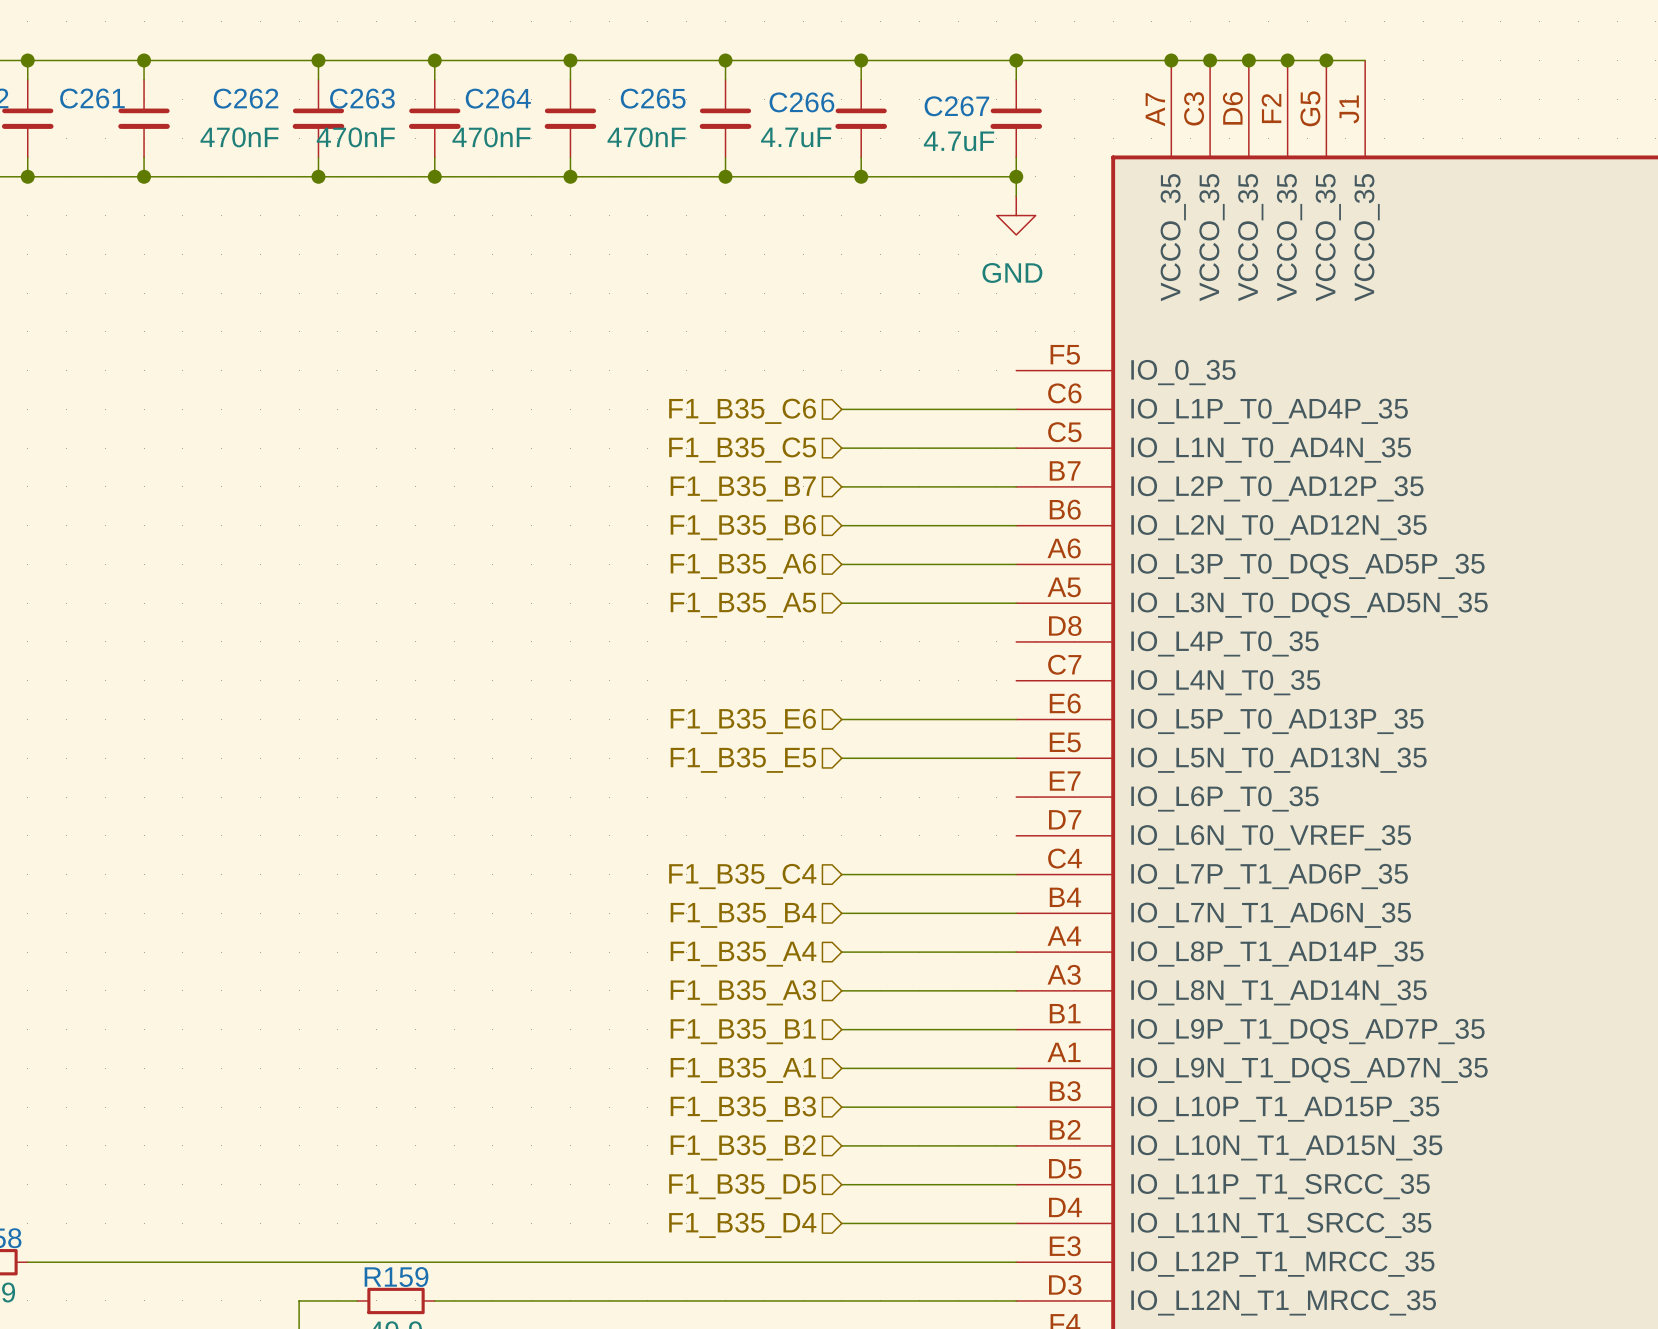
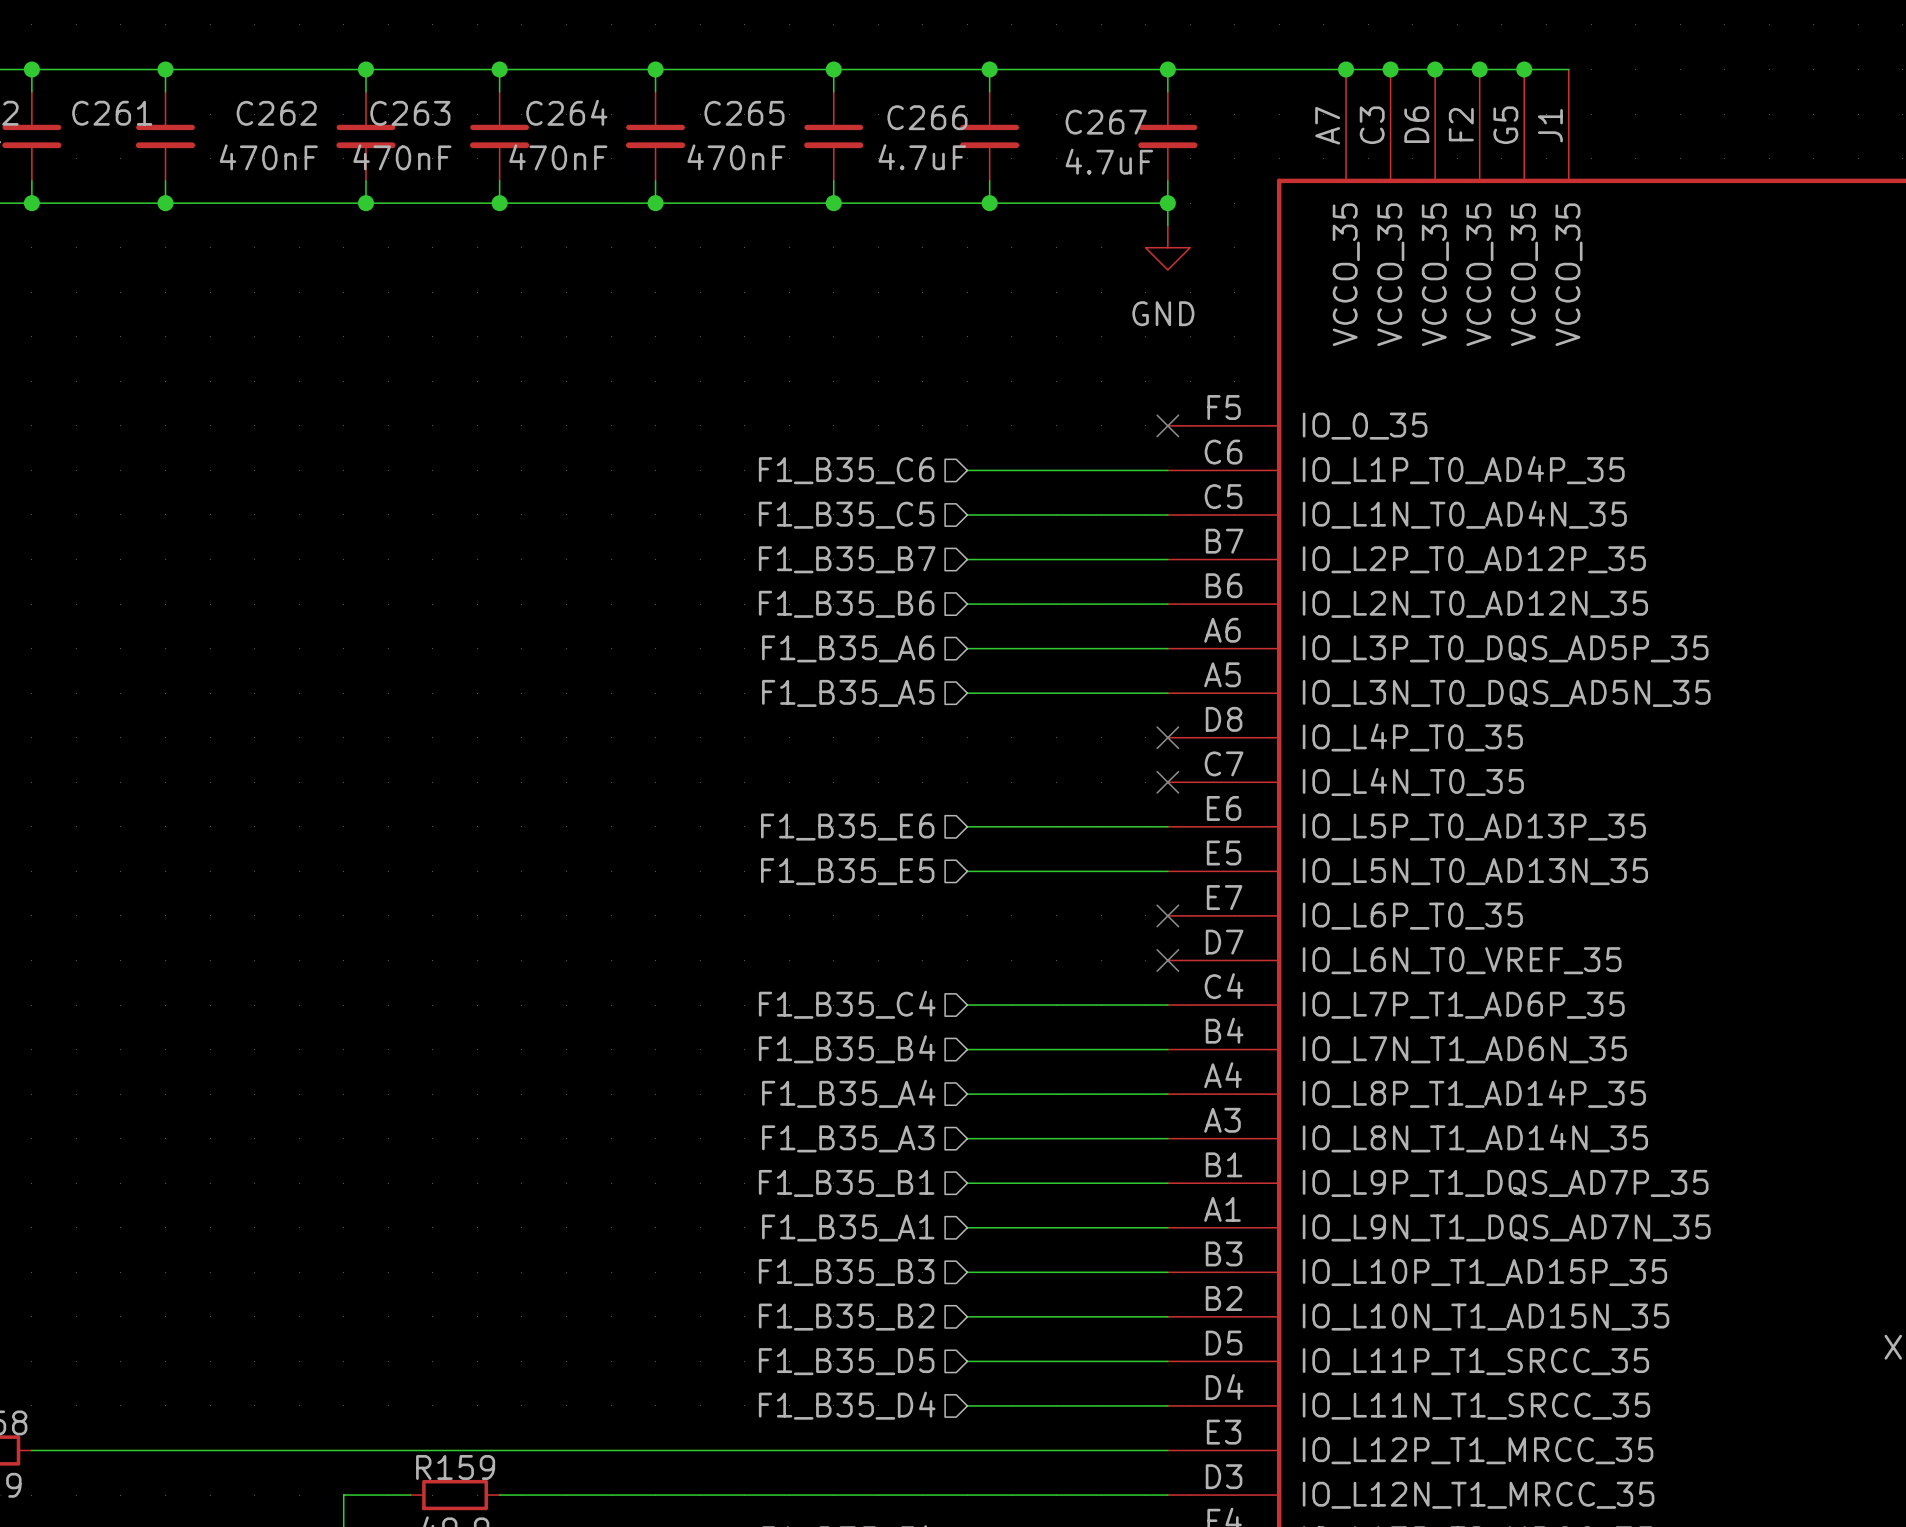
no-connect mark: none -> (1167, 425)
no-connect mark: none -> (1167, 737)
no-connect mark: none -> (1167, 782)
no-connect mark: none -> (1167, 915)
no-connect mark: none -> (1167, 960)

